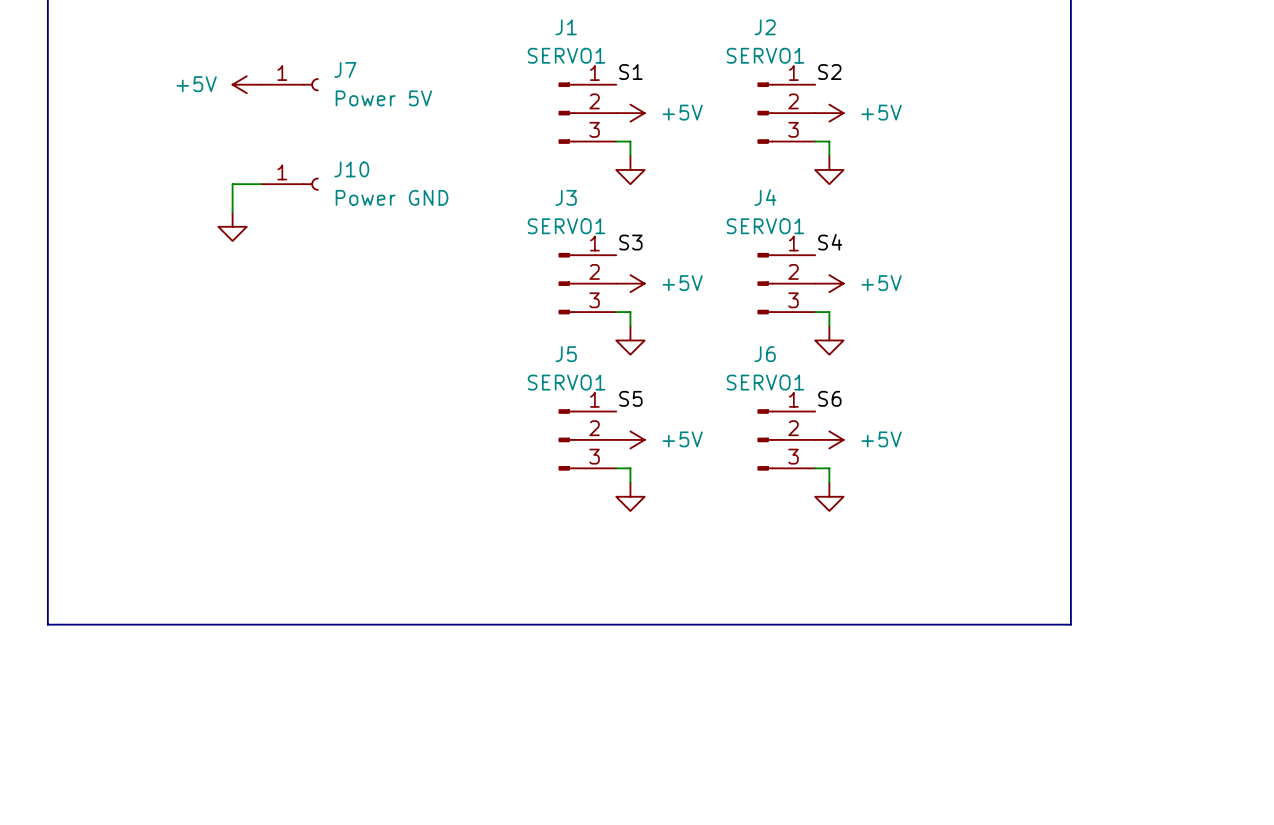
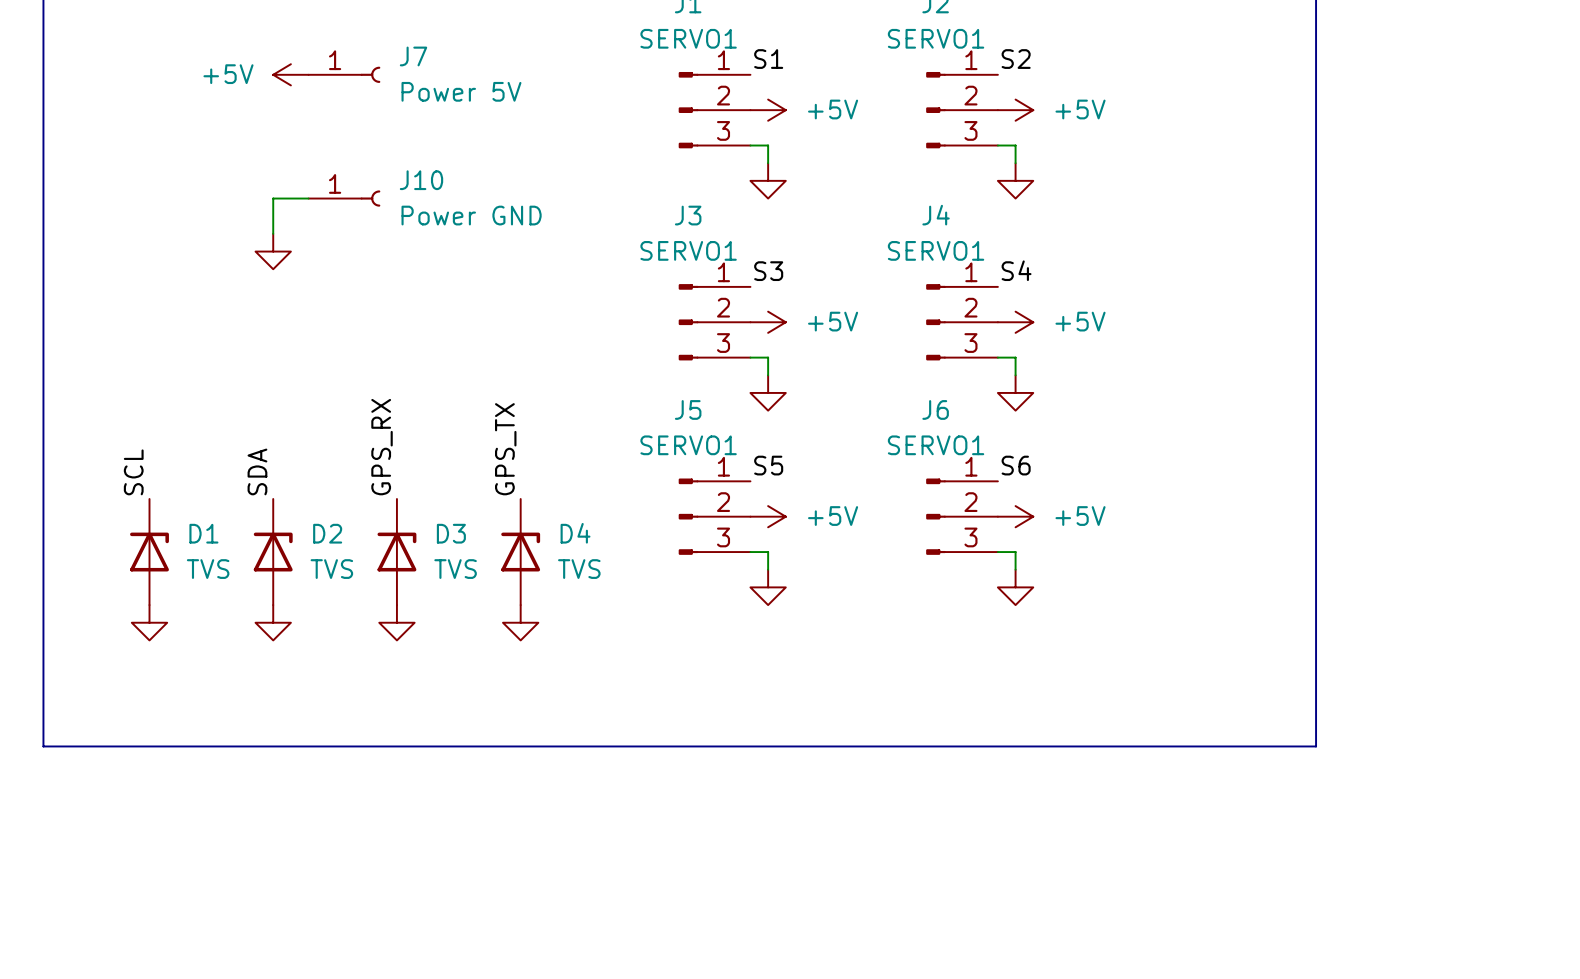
label: none -> GPS_RX (382, 447)
label: none -> GPS_TX (505, 449)
label: none -> SDA (257, 471)
label: none -> SCL (133, 472)
D1: none -> TVS (149, 552)
D2: none -> TVS (273, 552)
D3: none -> TVS (396, 552)
D4: none -> TVS (520, 552)
power symbol: none -> (149, 622)
power symbol: none -> (273, 622)
power symbol: none -> (396, 622)
power symbol: none -> (520, 622)

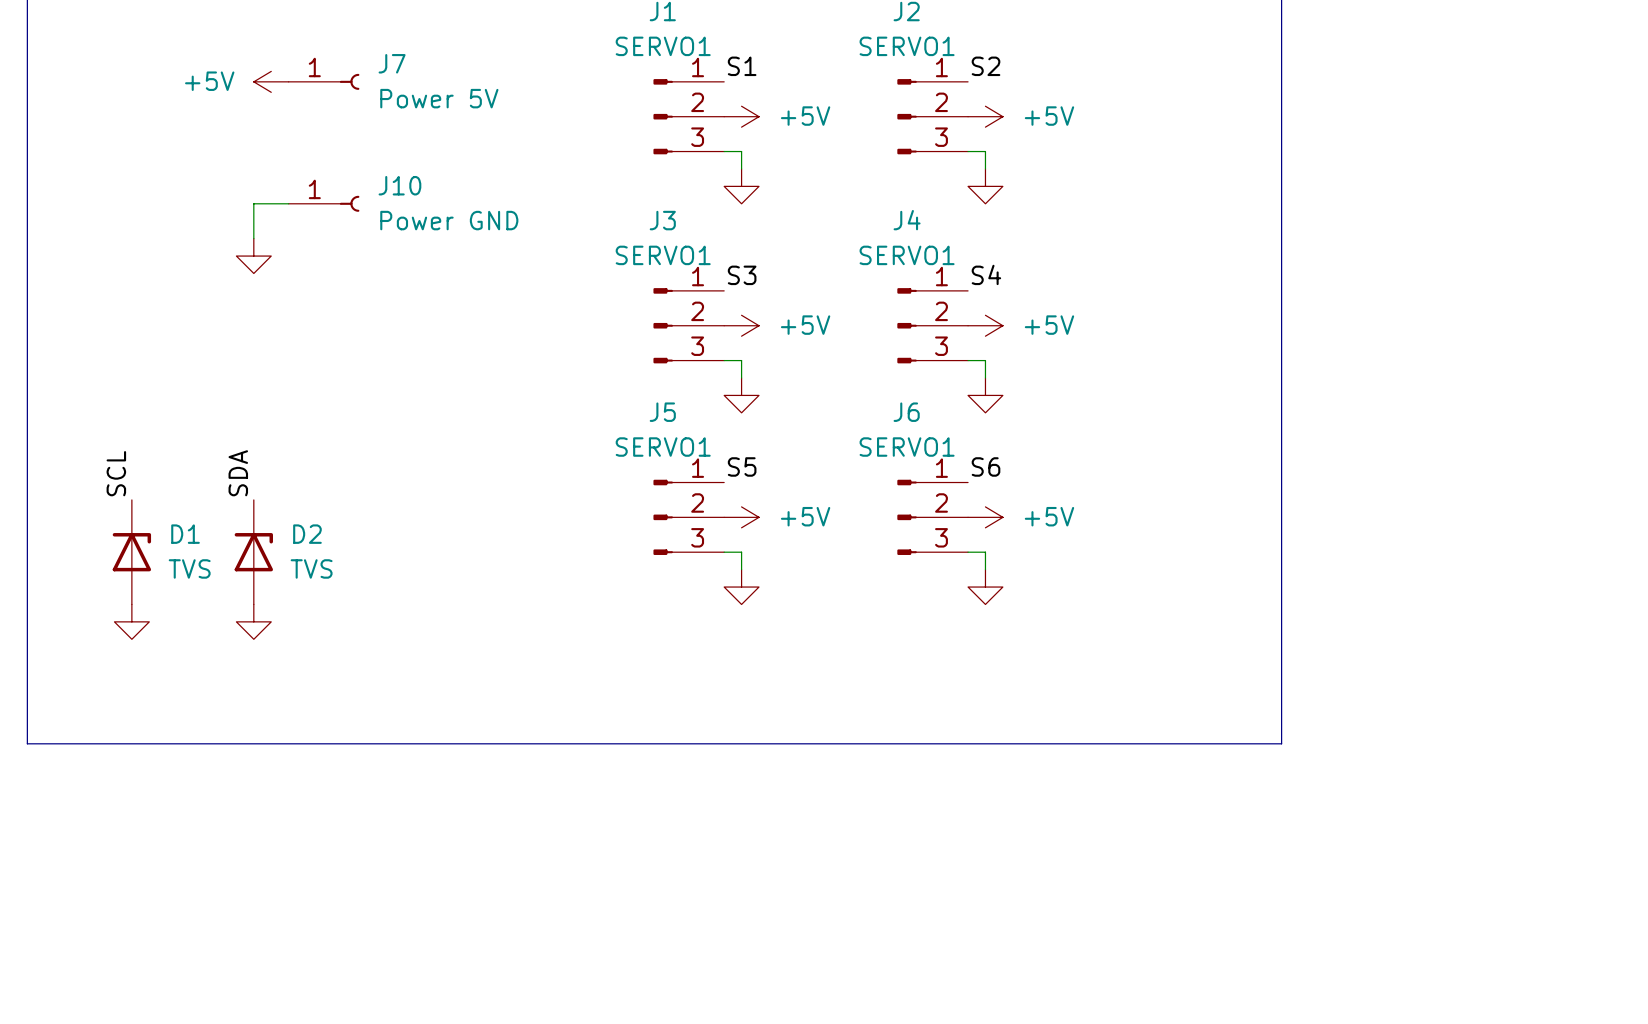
label: GPS_RX (382, 447) -> none
label: GPS_TX (505, 449) -> none
D3: TVS (396, 552) -> none
D4: TVS (520, 552) -> none
power symbol: (396, 622) -> none
power symbol: (520, 622) -> none

